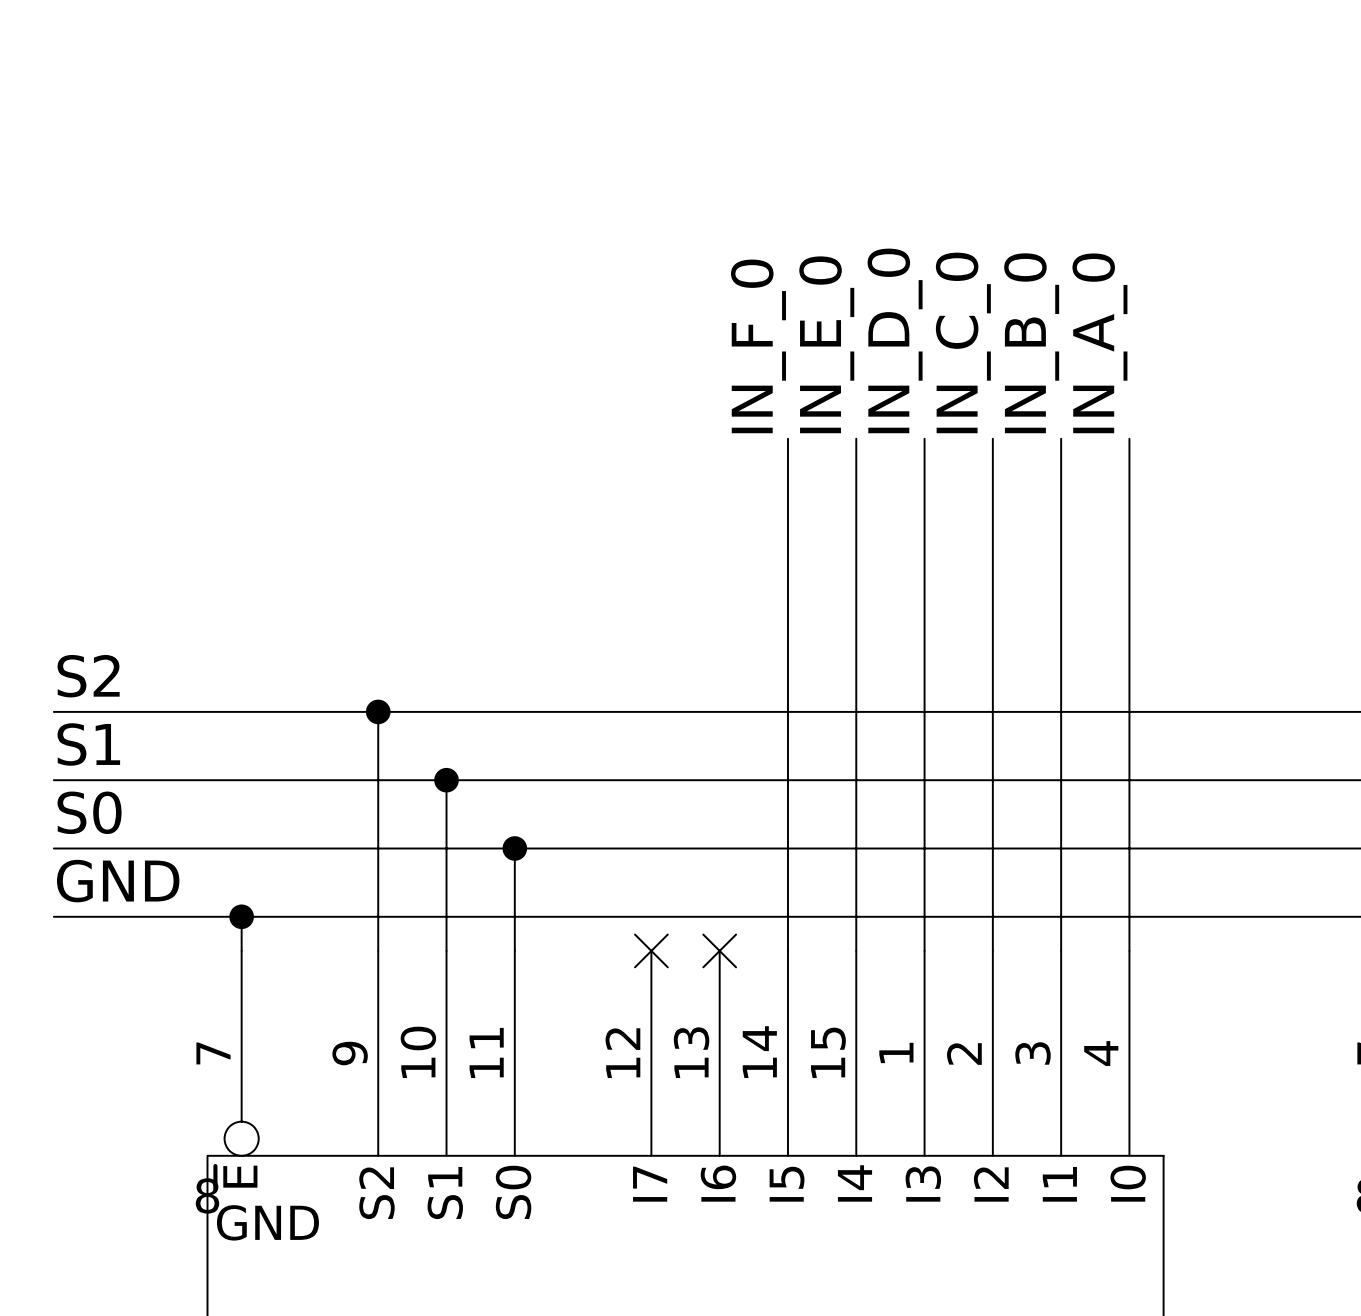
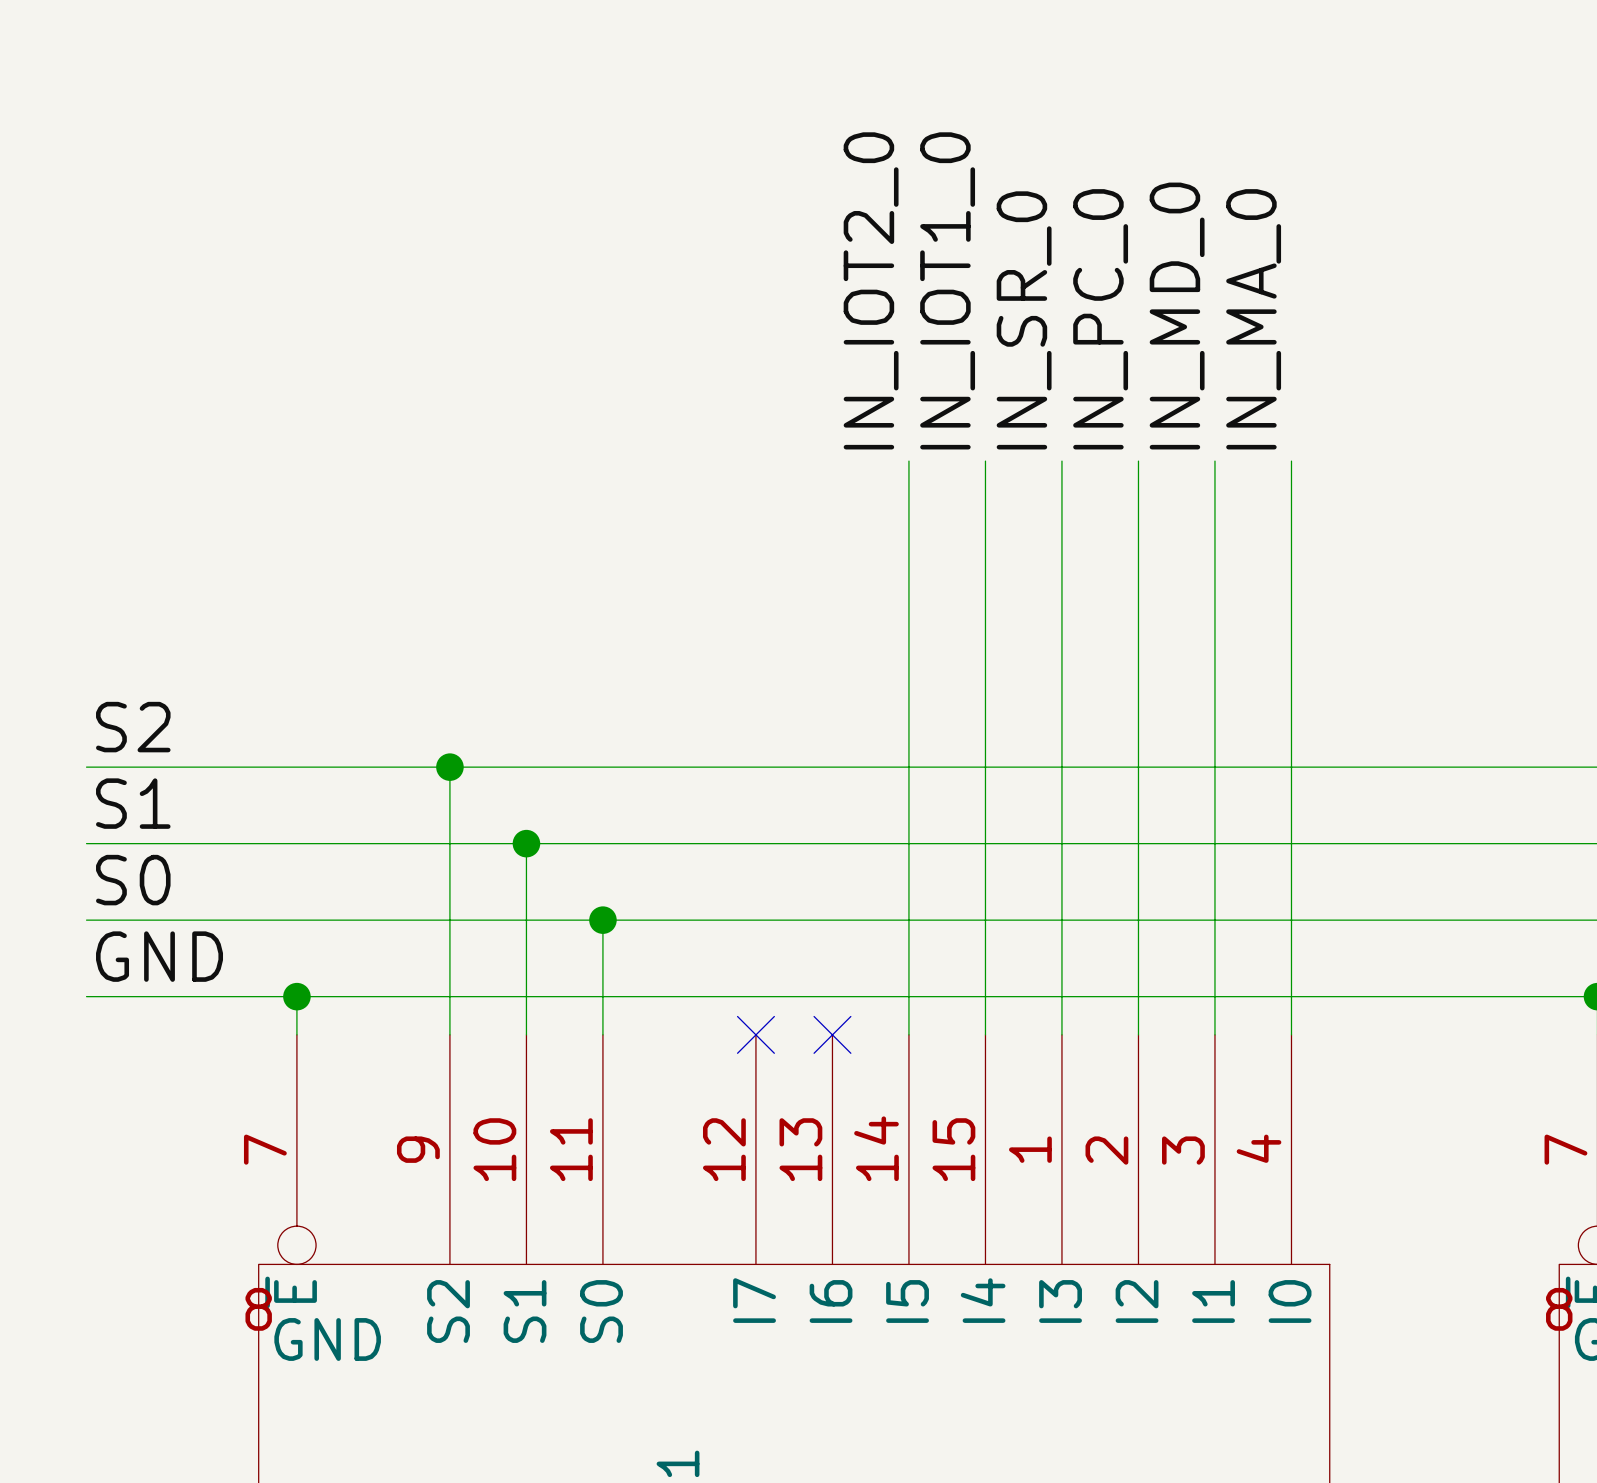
label: IN_D_0 (895, 340) -> IN_SR_0 (1024, 320)
label: IN_C_0 (963, 342) -> IN_PC_0 (1100, 319)
label: IN_B_0 (1031, 343) -> IN_MD_0 (1177, 316)
label: IN_A_0 (1099, 343) -> IN_MA_0 (1253, 319)
label: IN_E_0 (826, 344) -> IN_IOT1_0 (947, 290)
label: IN_F_0 (758, 346) -> IN_IOT2_0 (871, 290)

